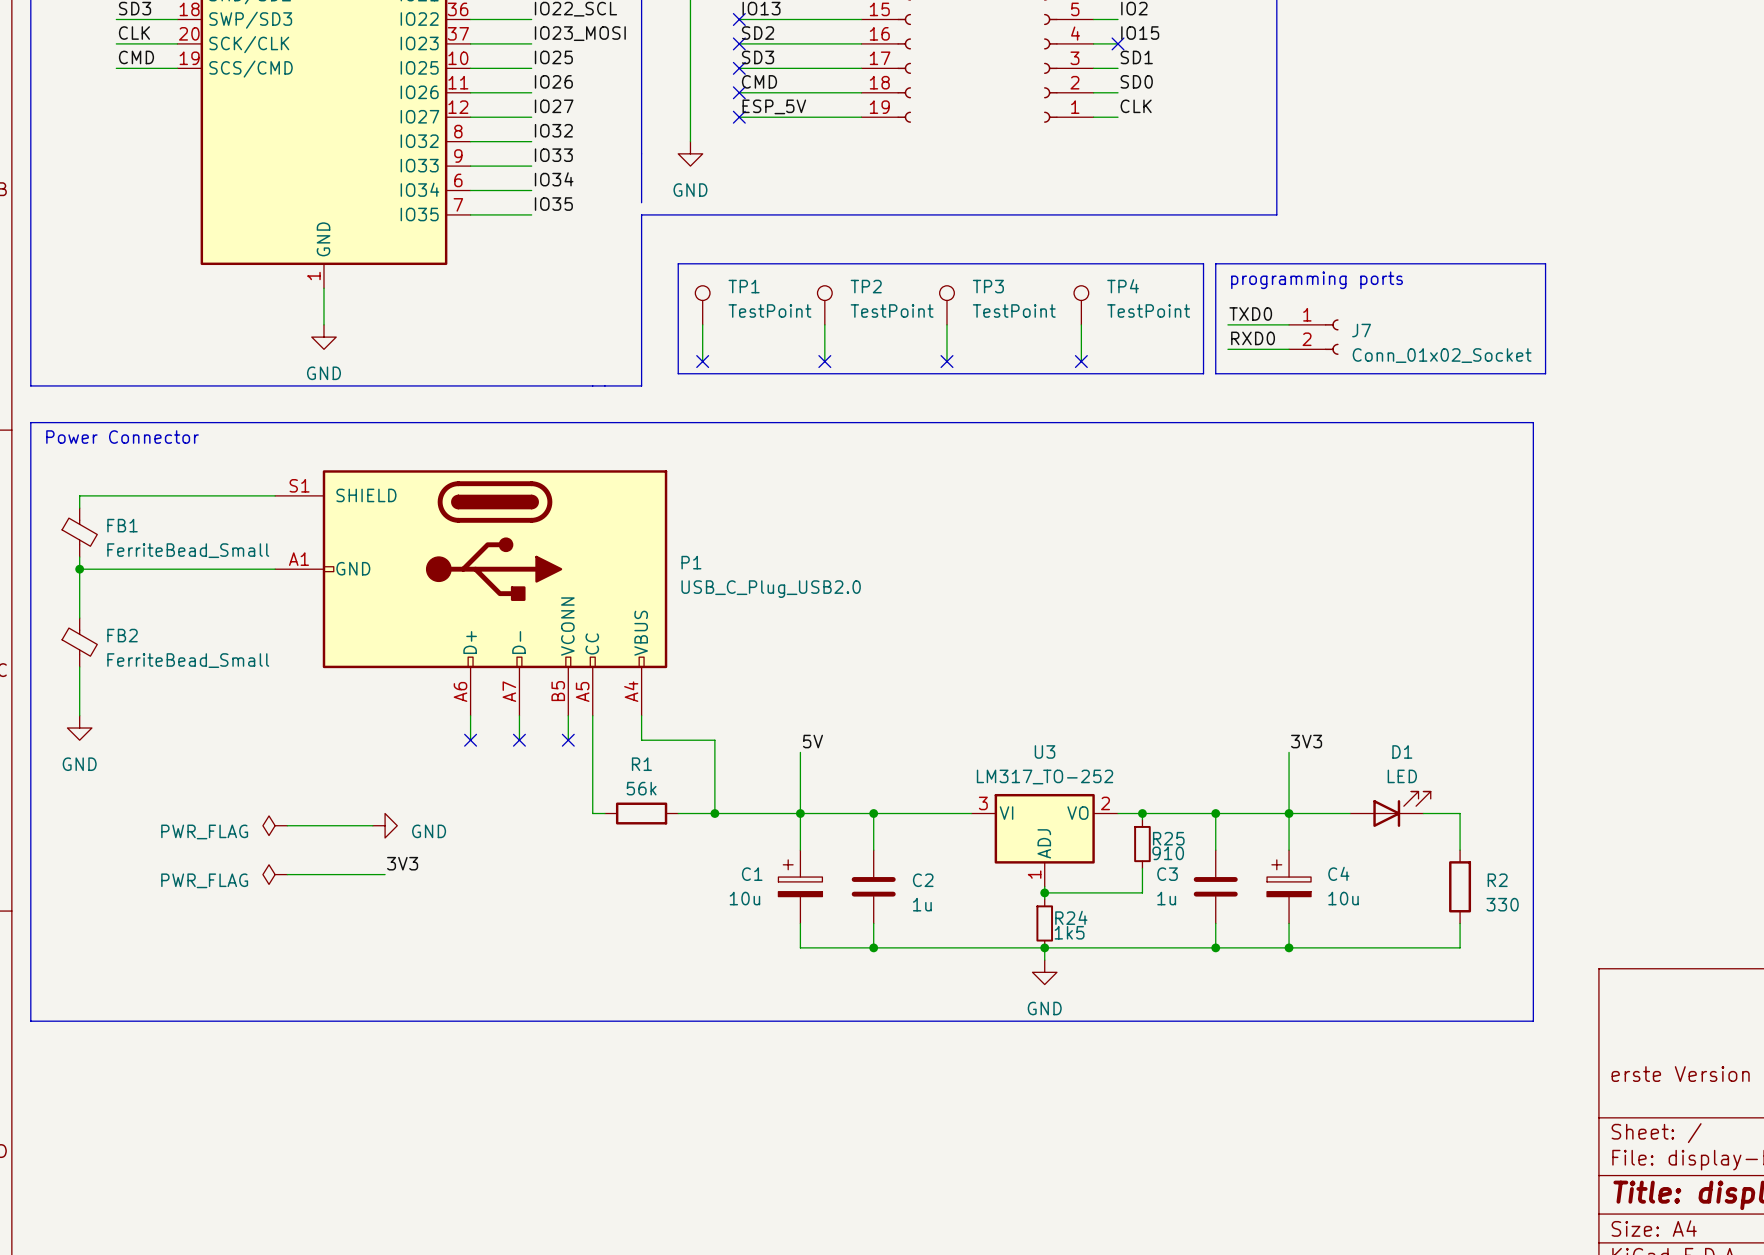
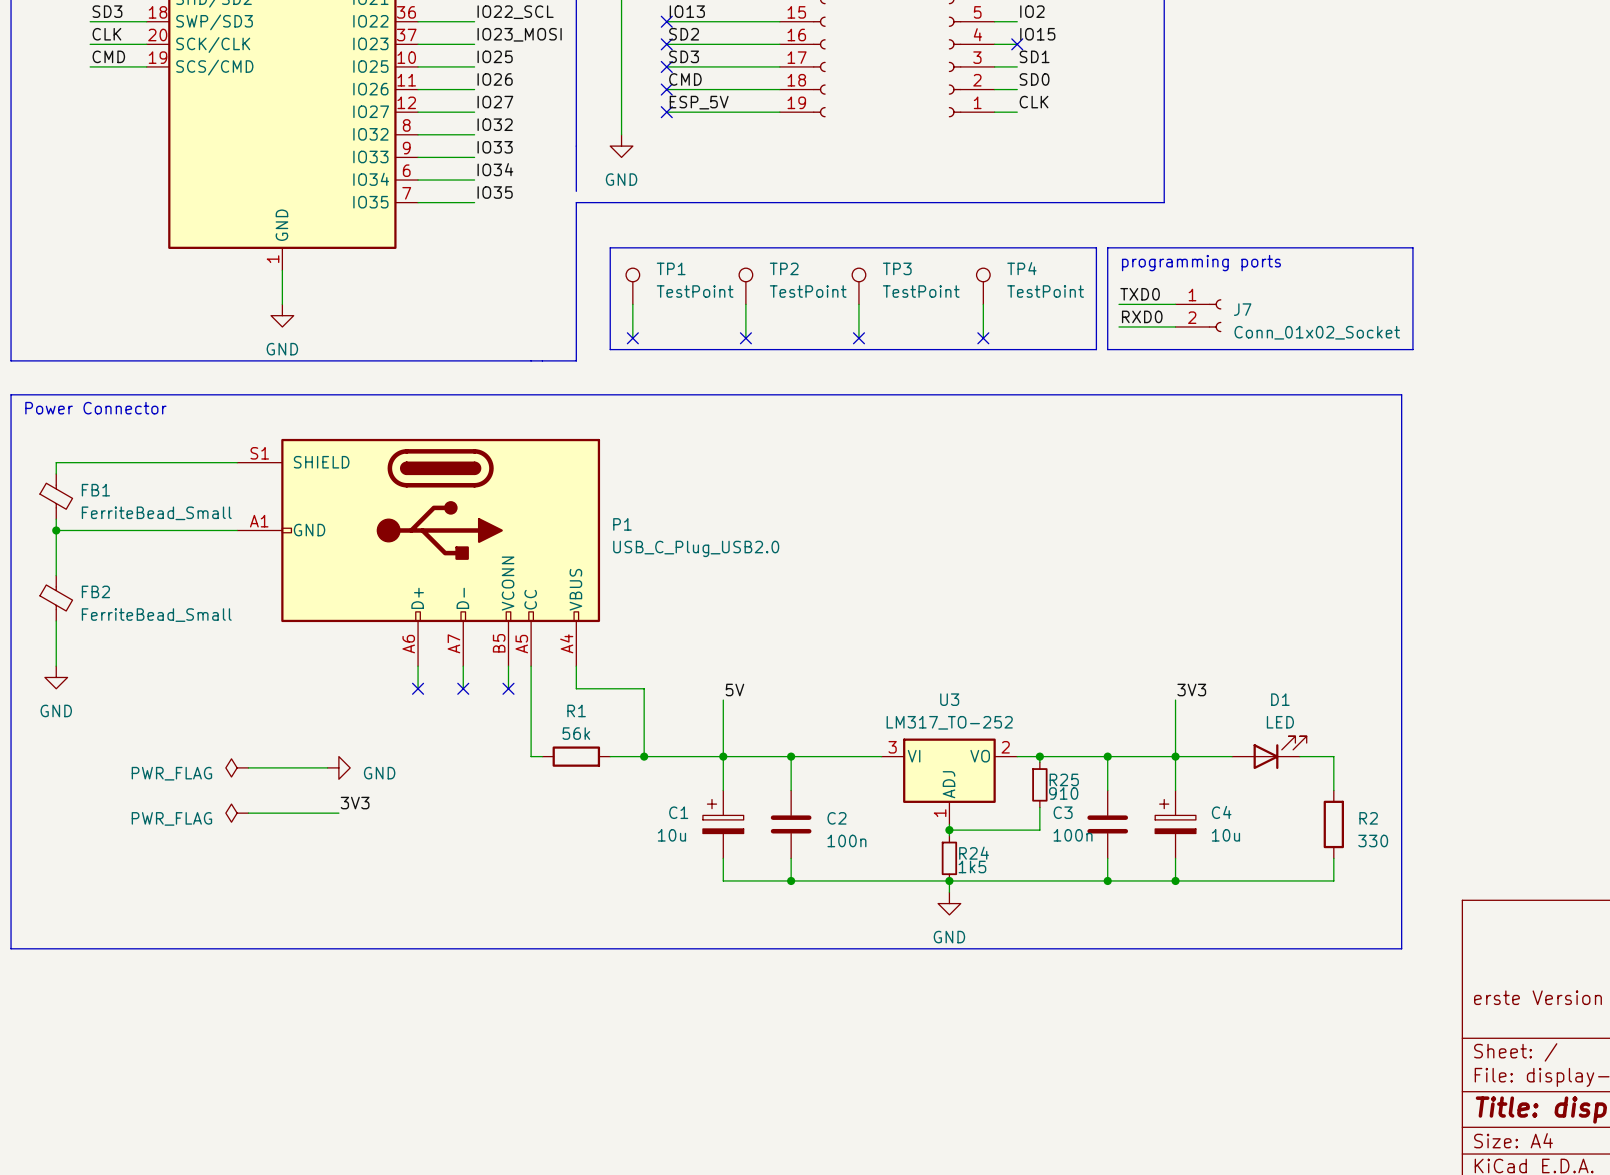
C3 value: 1u (1166, 898) -> 100n (1073, 835)
C2 value: 1u (922, 904) -> 100n (846, 840)

